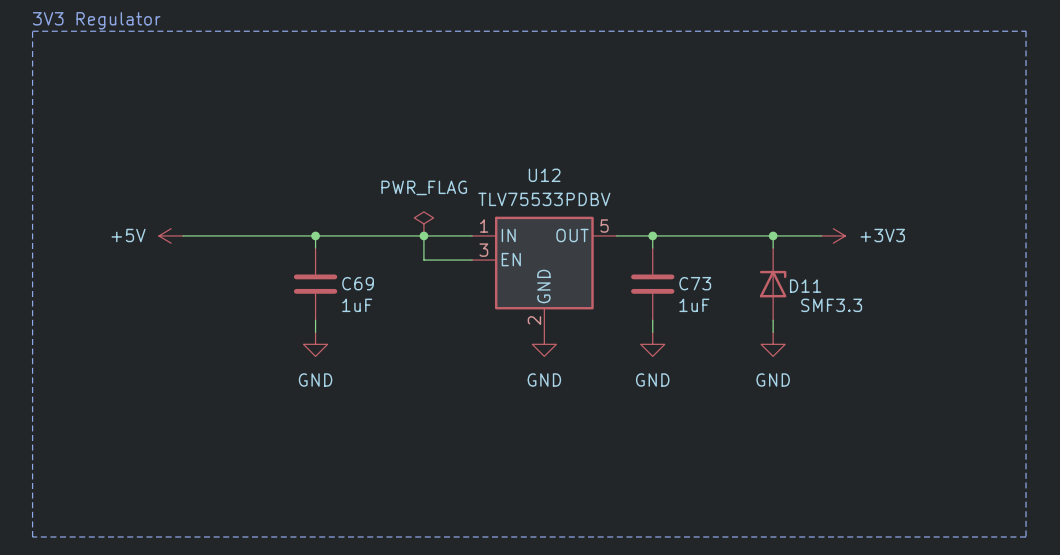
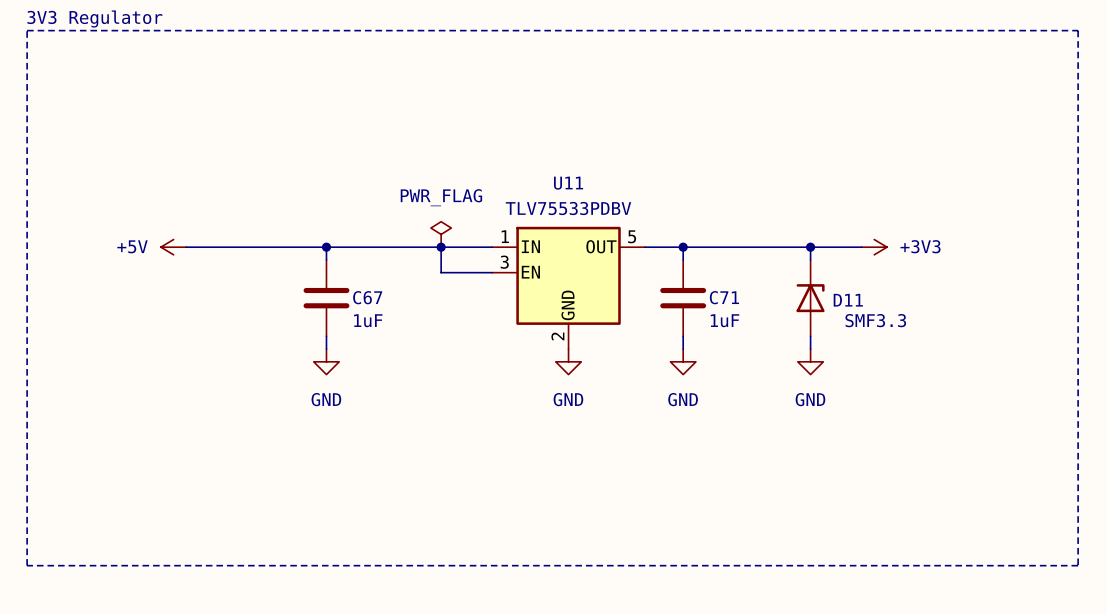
U12 name: U12 (544, 175) -> U11 (568, 183)
C69 name: C69 (358, 283) -> C67 (367, 297)
C73 name: C73 (695, 283) -> C71 (724, 297)

